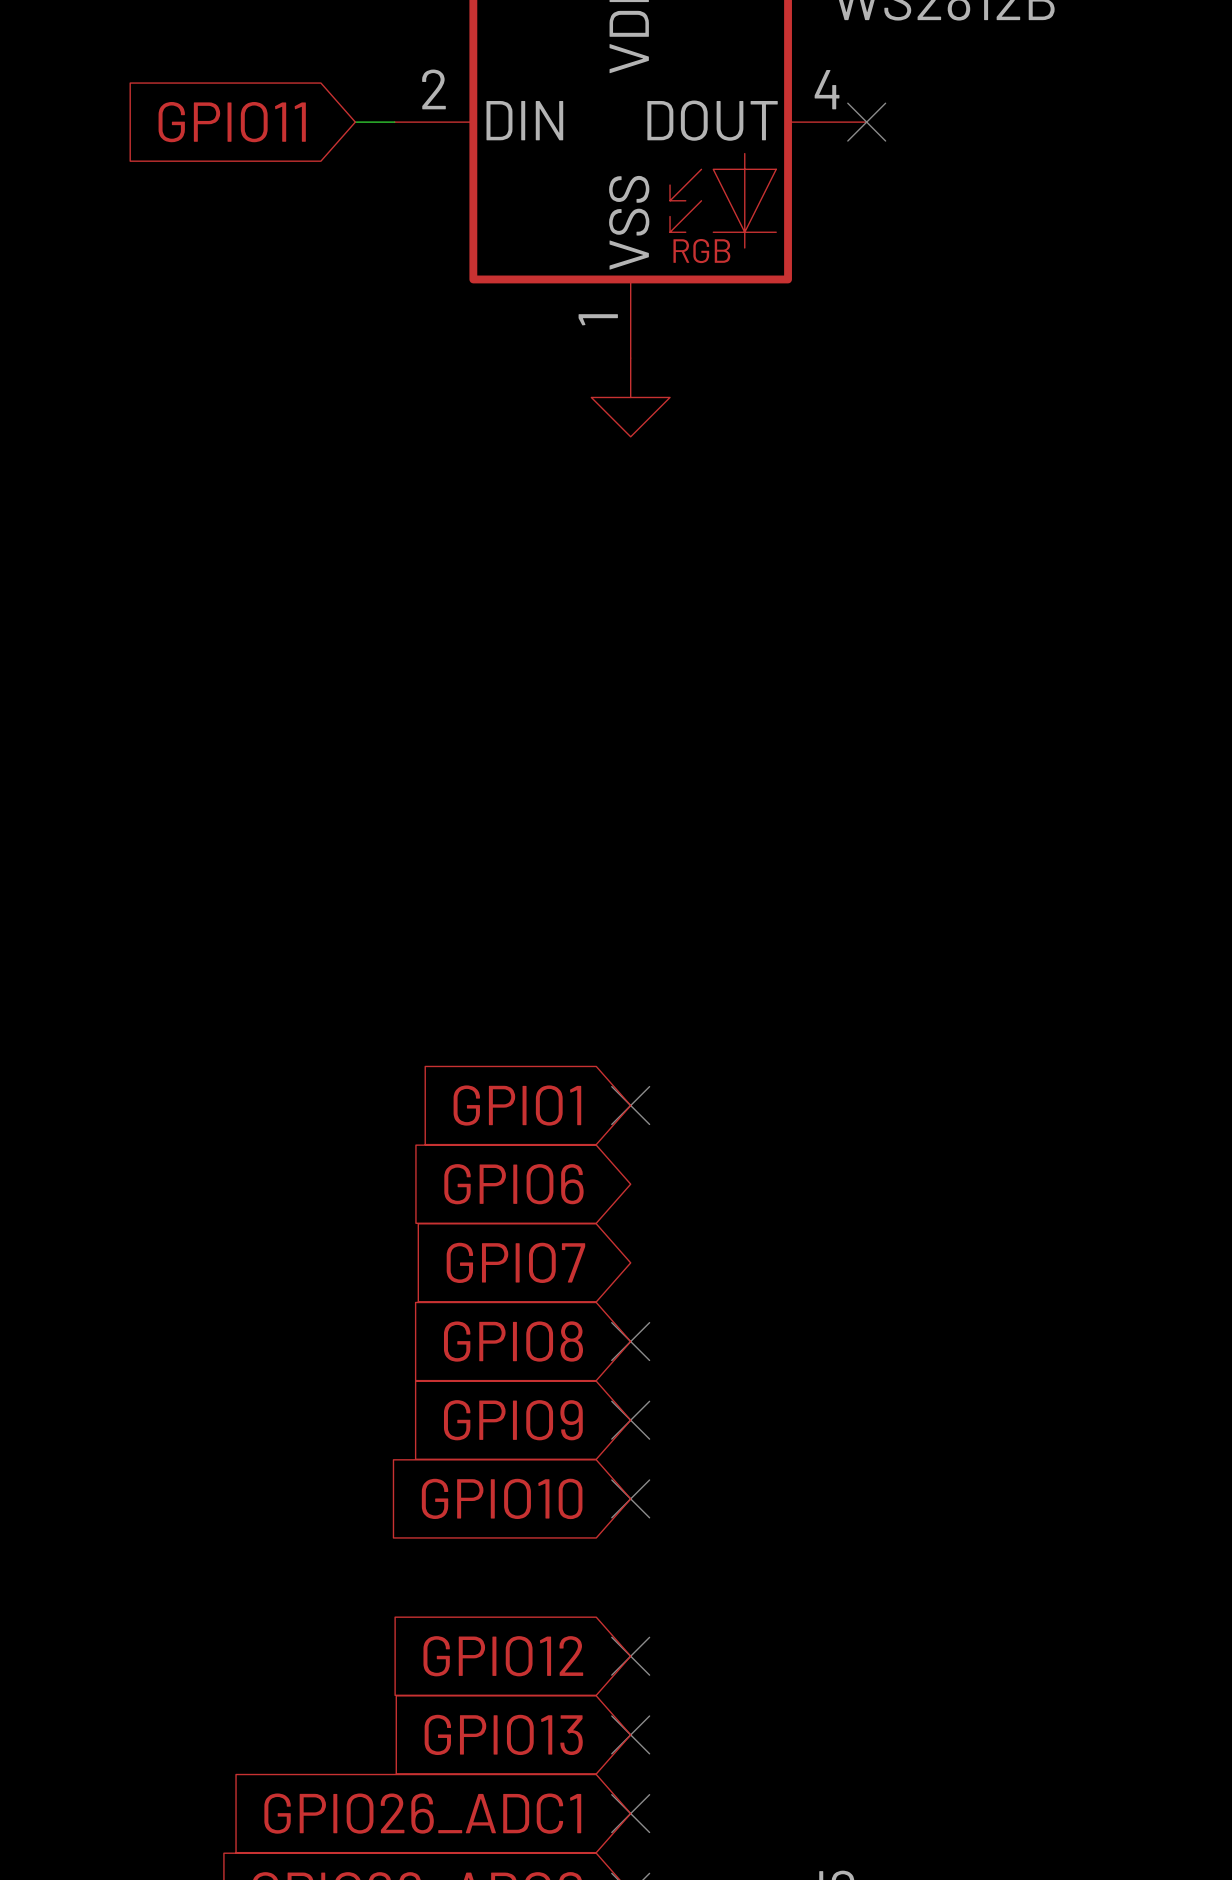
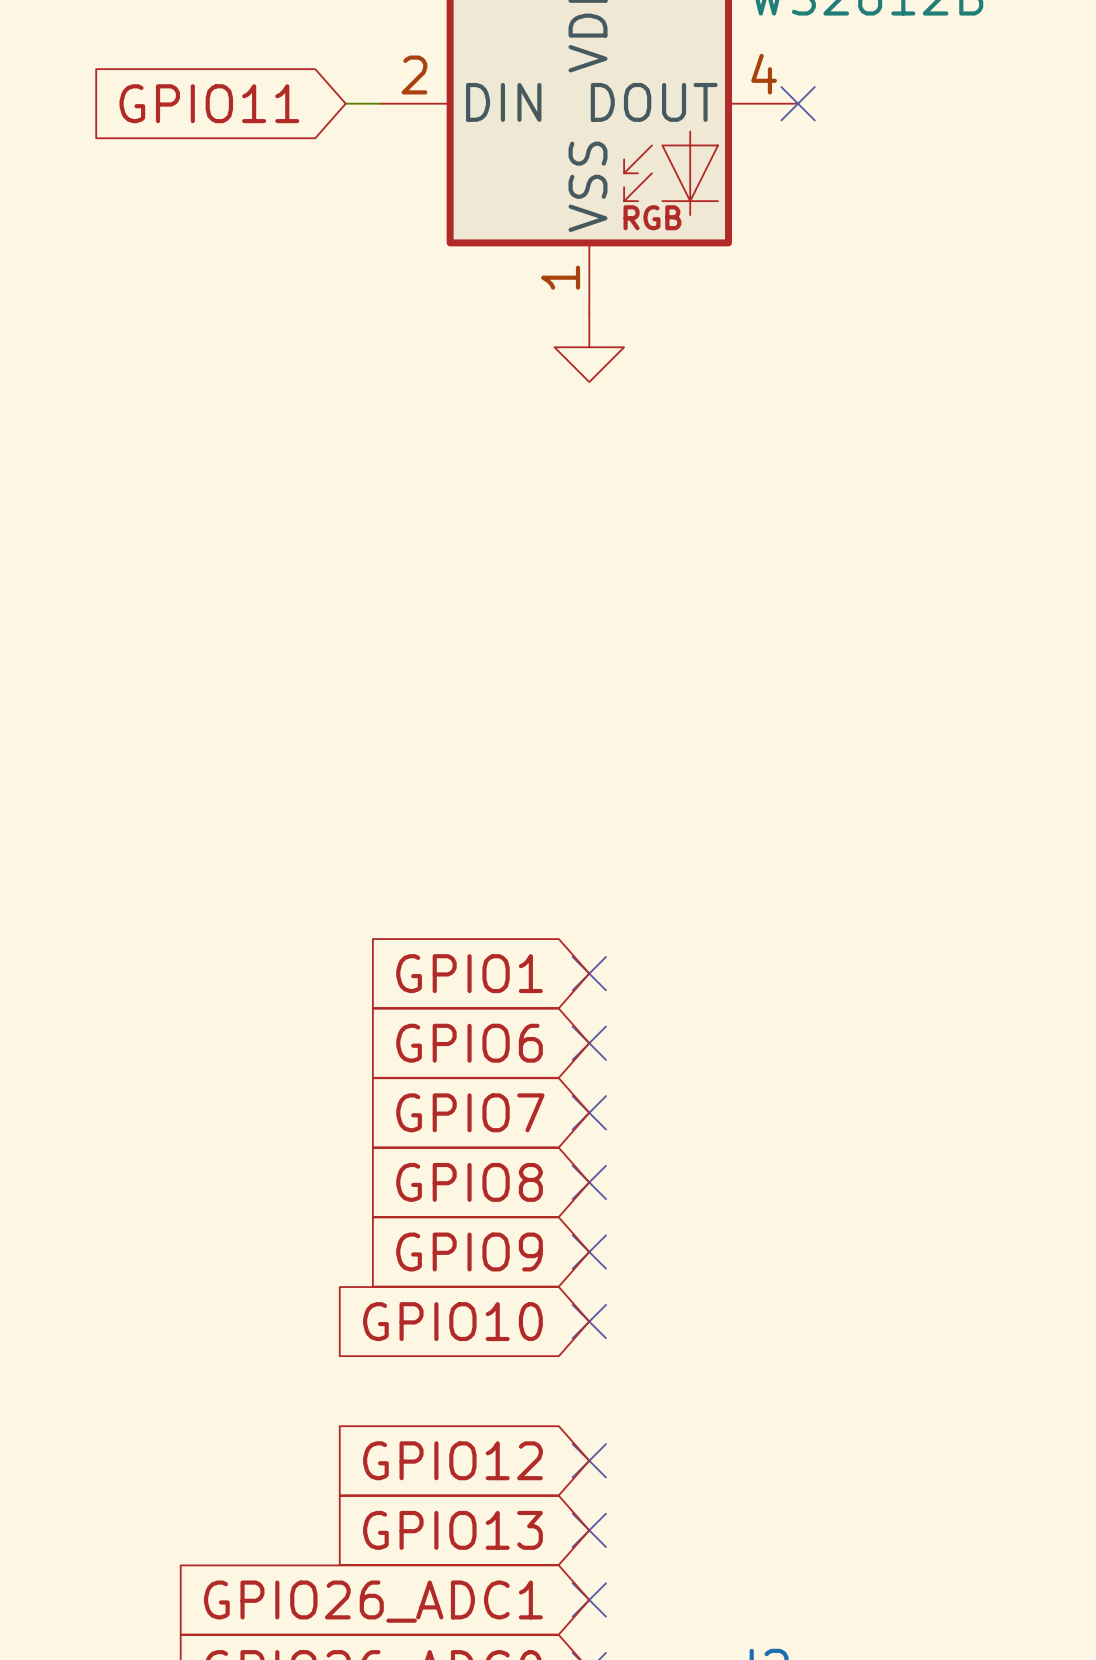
no-connect mark: none -> (589, 1043)
no-connect mark: none -> (589, 1112)

